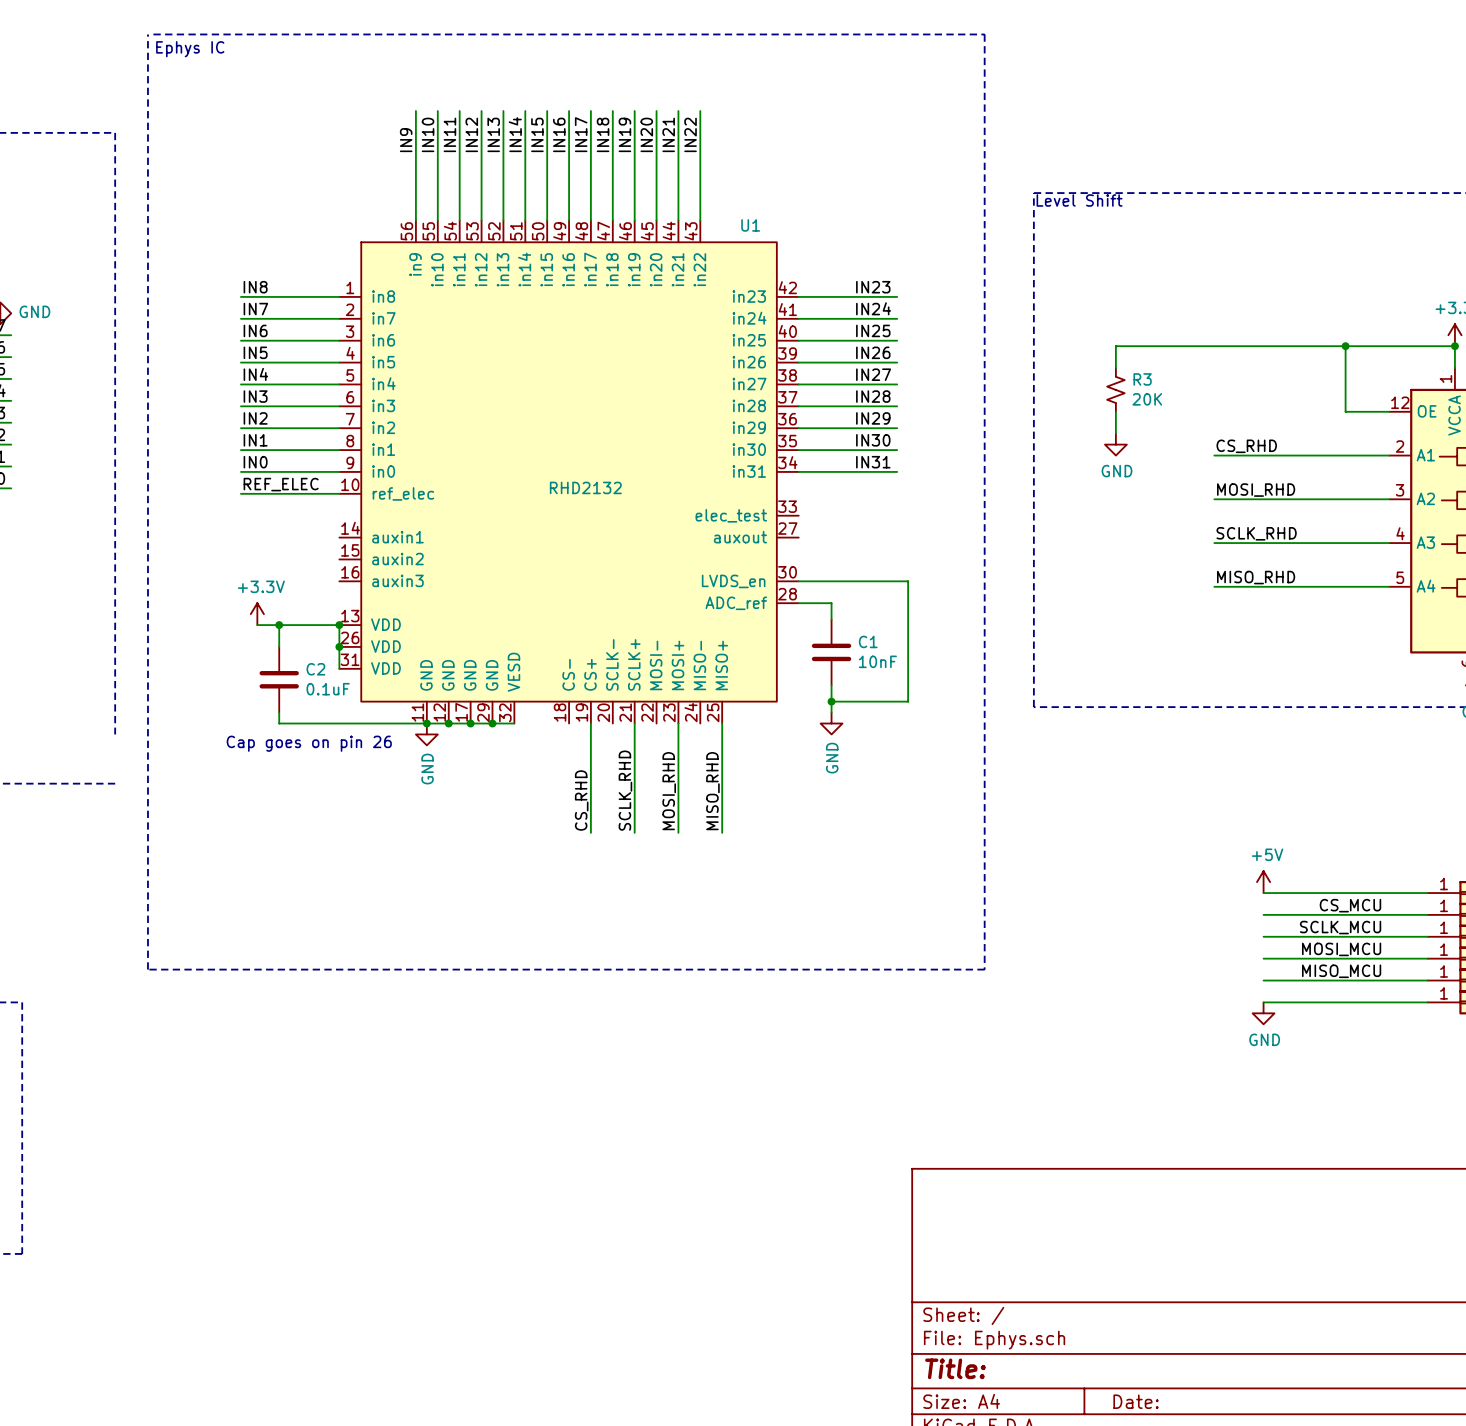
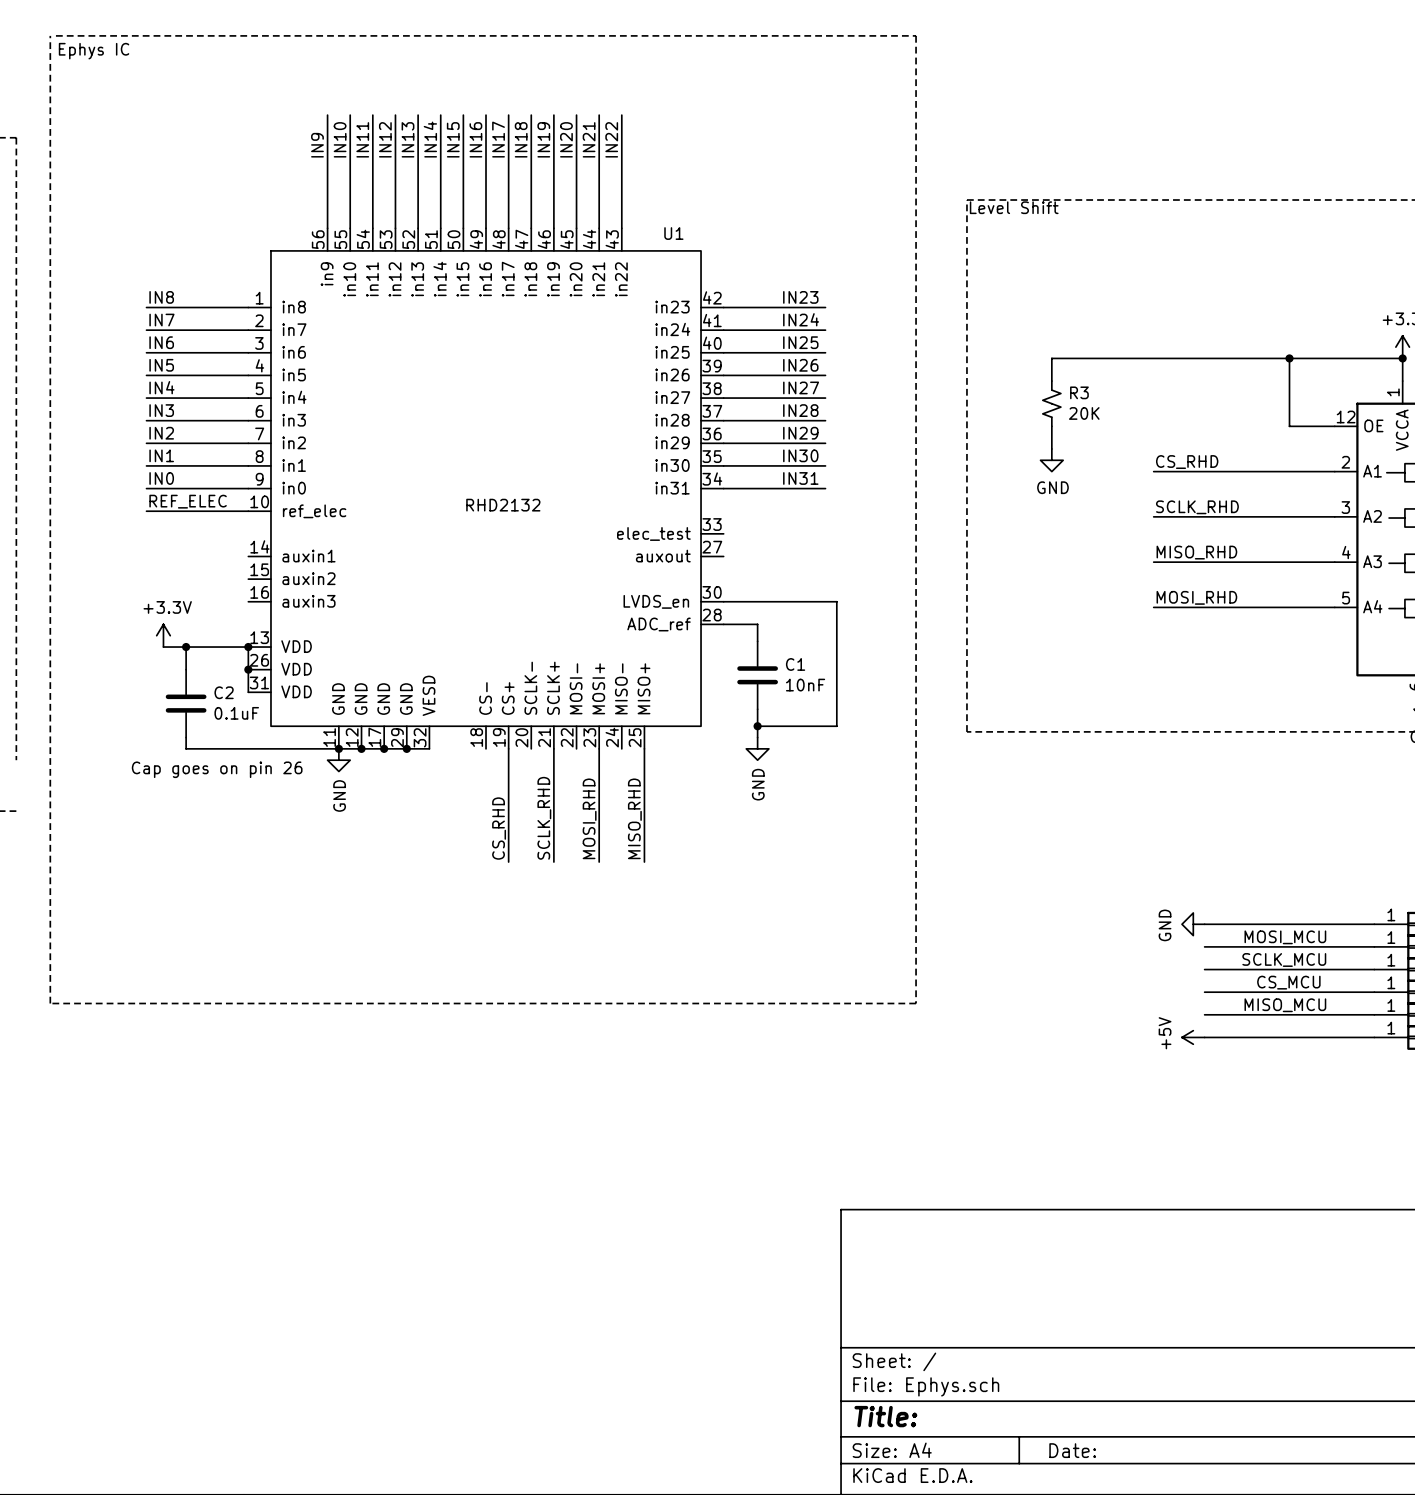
label: MOSI_RHD (1256, 490) -> SCLK_RHD (1197, 507)
label: SCLK_RHD (1256, 533) -> MISO_RHD (1196, 552)
label: MISO_RHD (1256, 577) -> MOSI_RHD (1196, 597)
power symbol rotation: 0° (1263, 882) -> 90° counterclockwise (1193, 1037)
power symbol position: +5V (1263, 882) -> +5V (1193, 1037)
label: CS_MCU (1350, 905) -> MOSI_MCU (1285, 937)
label: MOSI_MCU (1341, 949) -> CS_MCU (1288, 982)
power symbol rotation: 0° (1263, 1013) -> 90° clockwise (1193, 924)
power symbol position: GND (1263, 1013) -> GND (1193, 924)

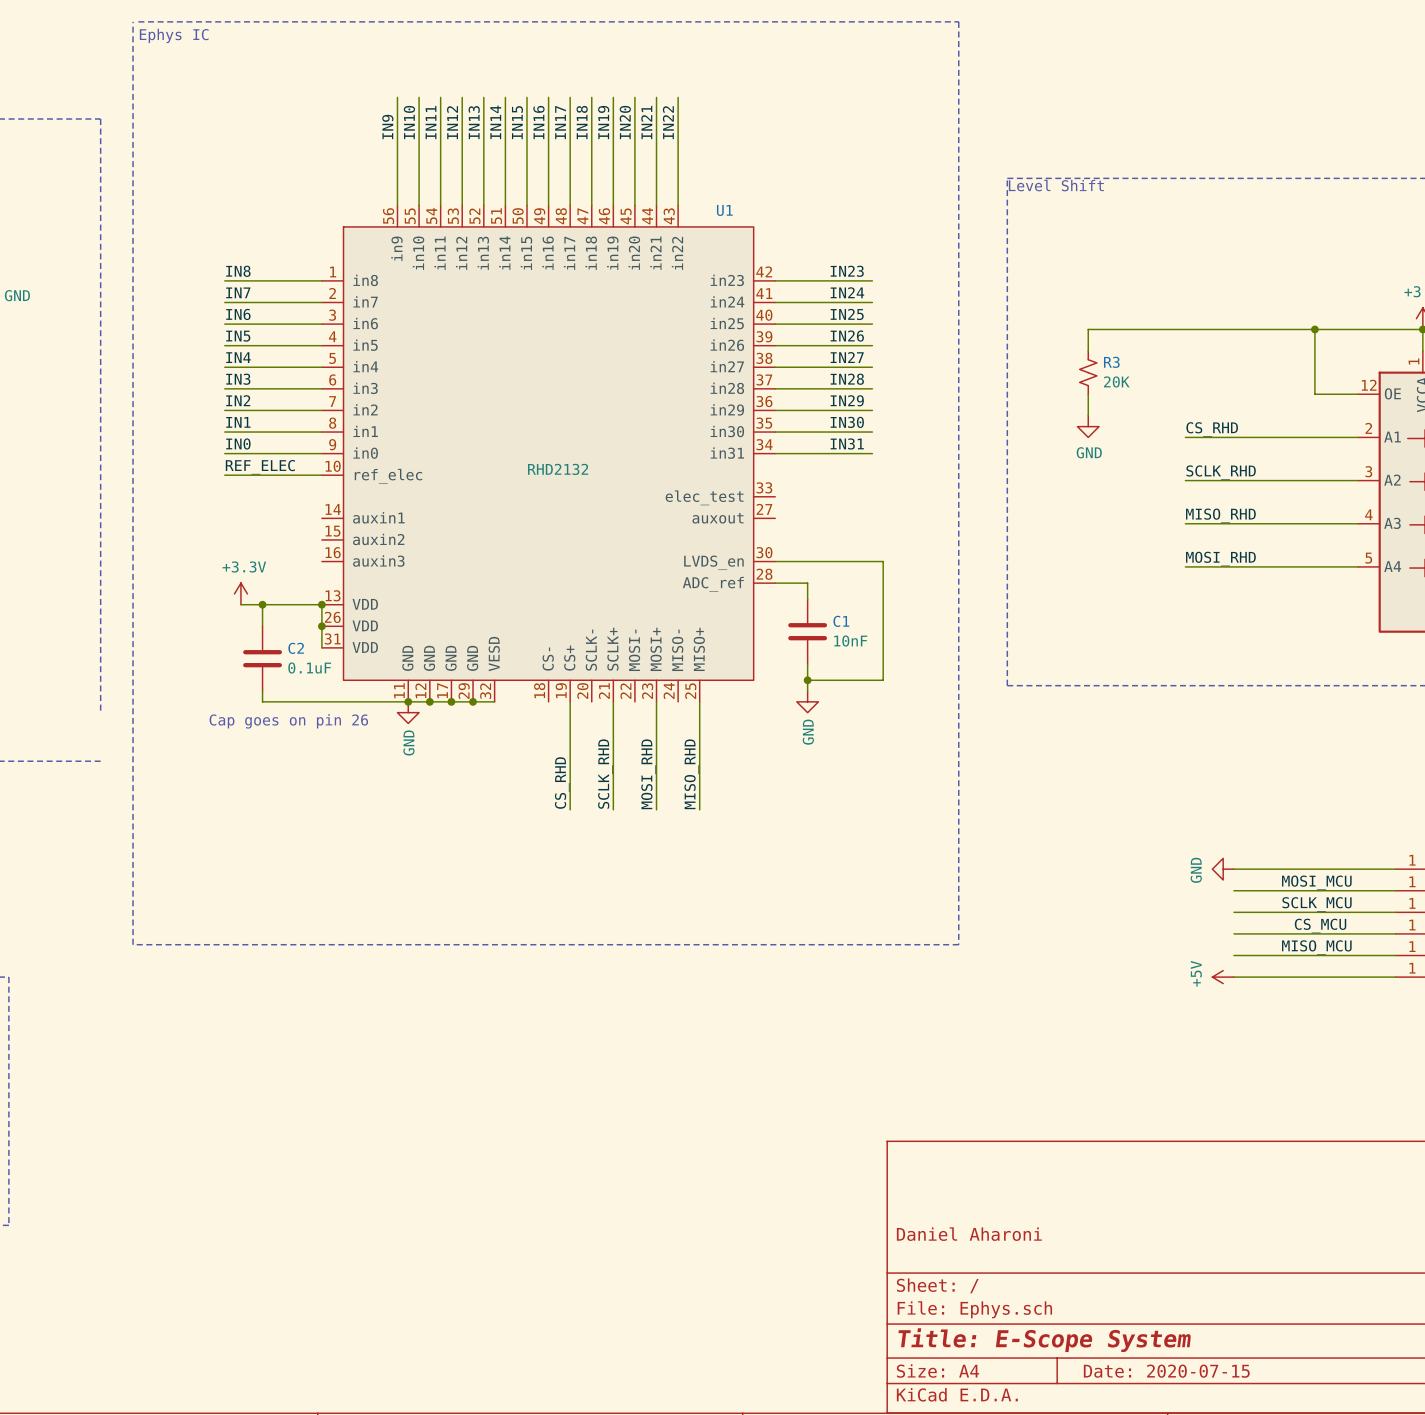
title block: none -> Daniel Aharoni (969, 1234)
title block: Title: (885, 1416) -> Title: E-Scope System (1044, 1340)
title block: Date: (1072, 1450) -> Date: 2020-07-15 (1166, 1371)

